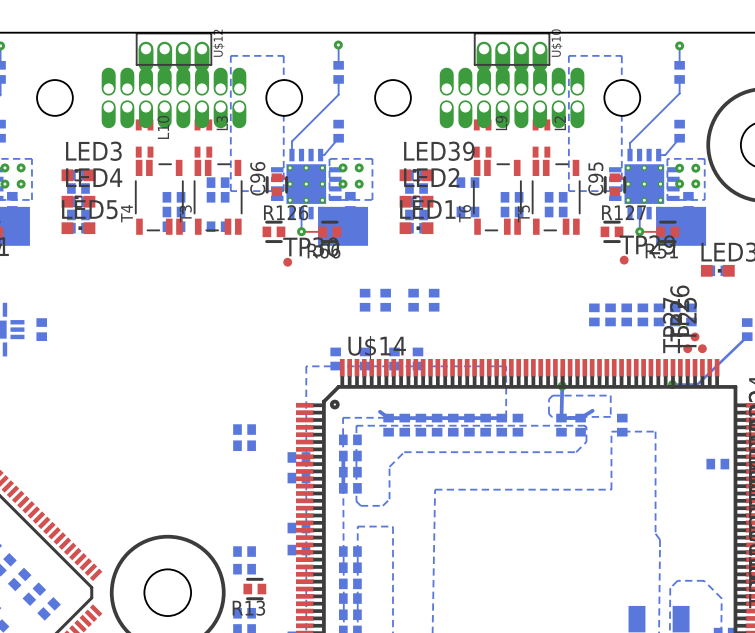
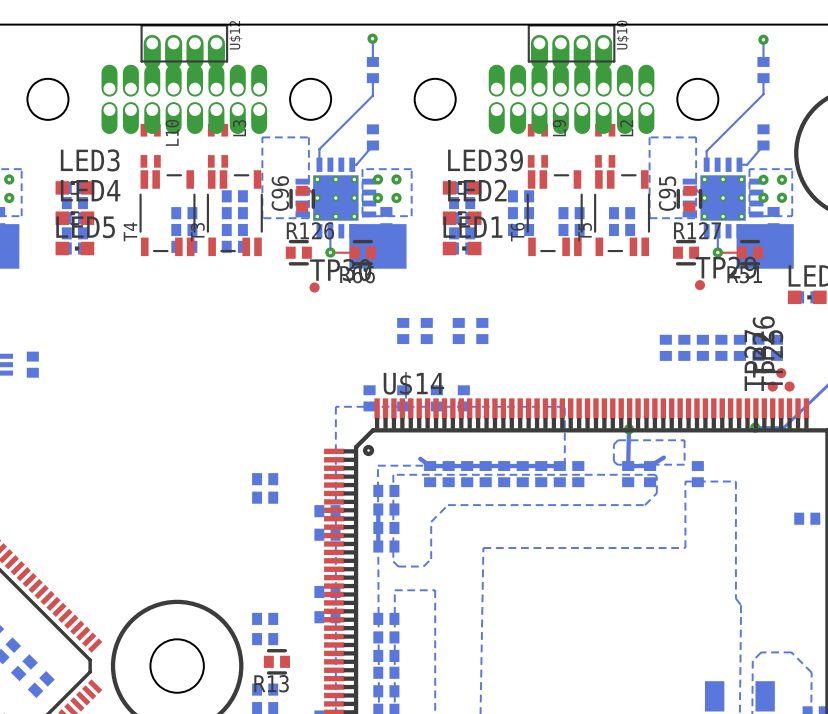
bottom zone outline: (230, 55) (283, 55) (283, 191) (230, 191) (230, 55) -> none
bottom zone outline: (568, 55) (621, 55) (621, 191) (568, 191) (568, 55) -> none
bottom zone outline: none -> (262, 137) (308, 137) (308, 218) (262, 218) (262, 137)
bottom zone outline: none -> (649, 137) (696, 137) (696, 218) (649, 218) (649, 137)
part: none -> (521, 213)
part: none -> (234, 229)

